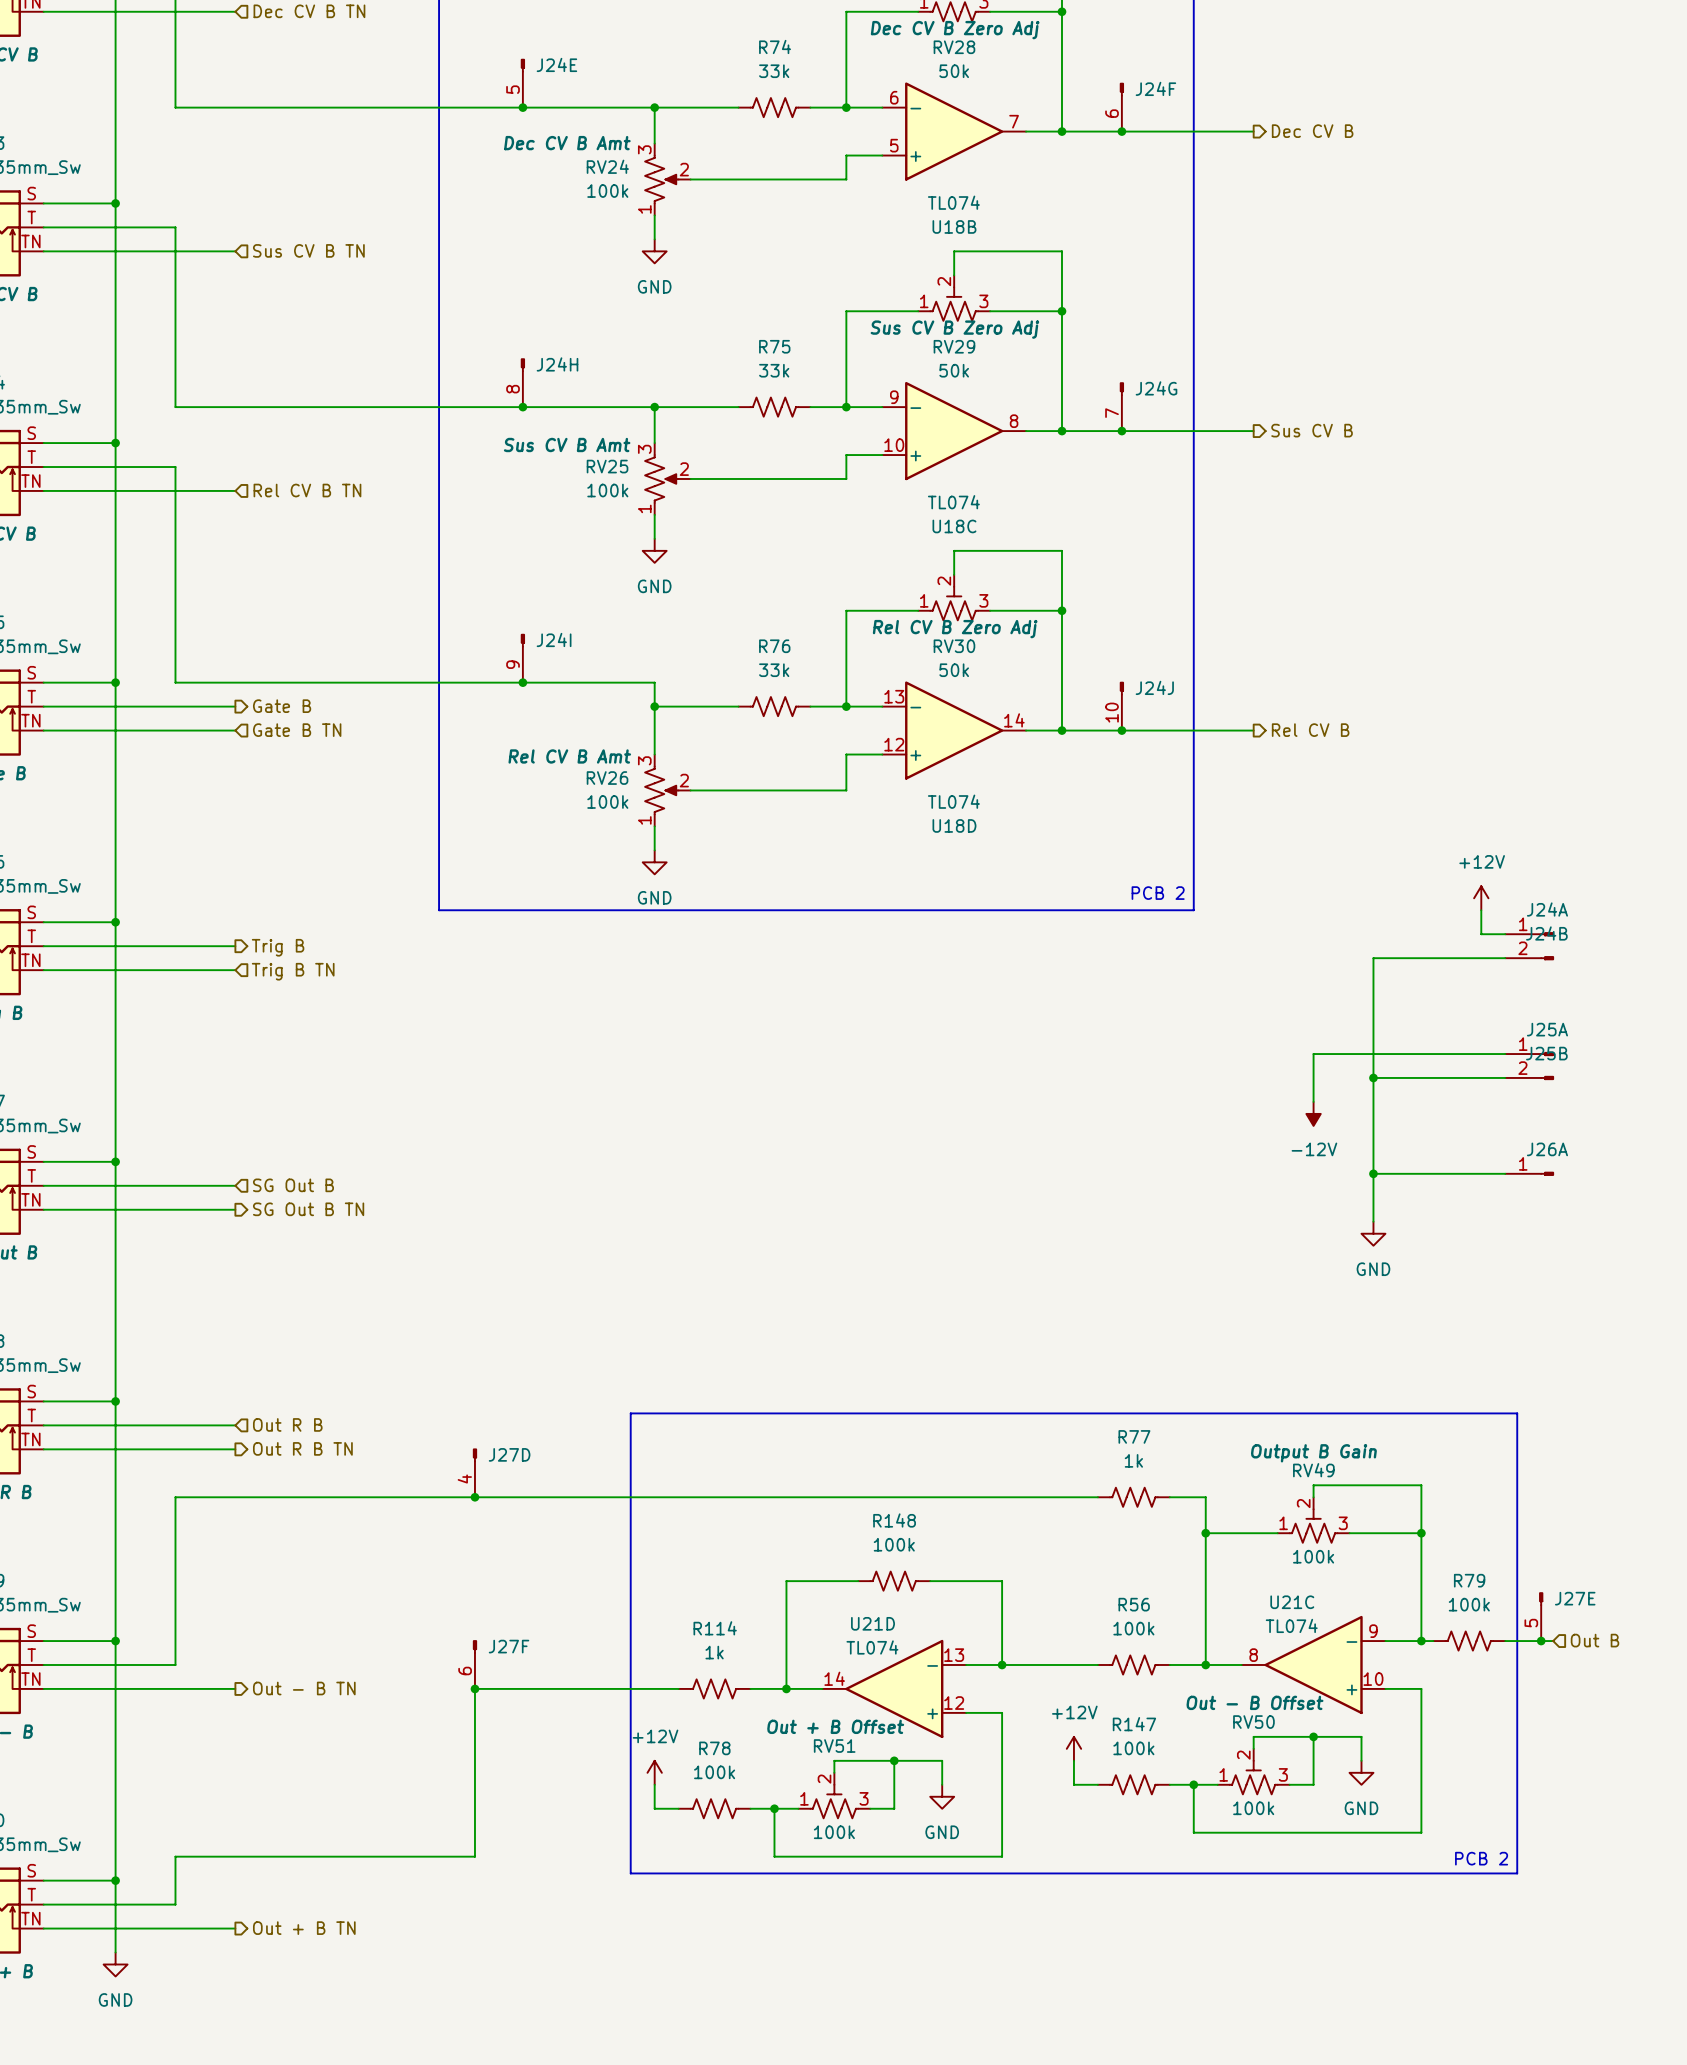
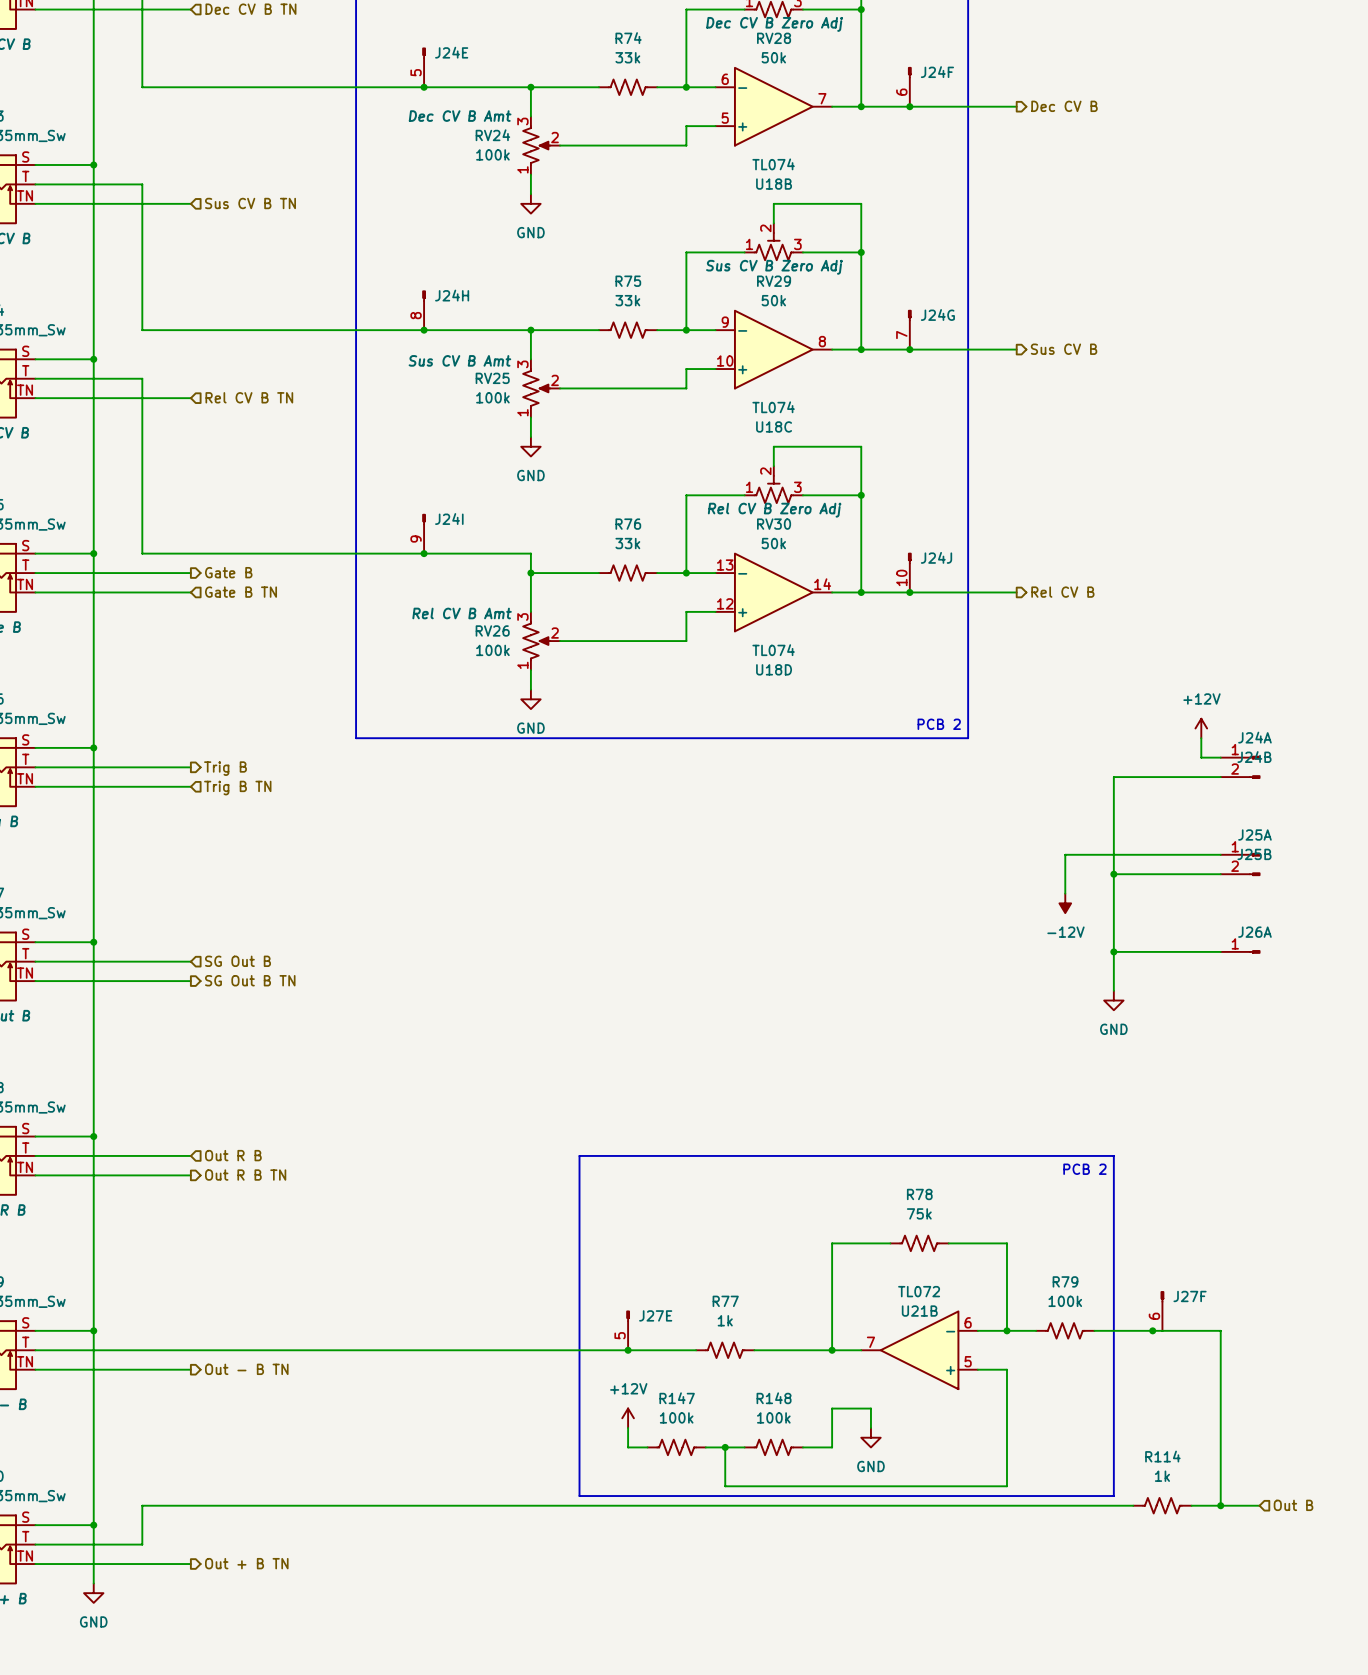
line: (630, 1413) (1517, 1413) (1517, 1873) (630, 1873) (630, 1413) -> (579, 1155) (579, 1496) (1113, 1496) (1113, 1155) (579, 1155)
text: none -> PCB 2 (1084, 1169)
J27D: (474, 1472) -> none
junction: (474, 1497) -> none
wire: (1097, 1497) (175, 1497) (175, 1664) -> (696, 1350) (142, 1350)
R77 position: (1133, 1497) -> (725, 1350)
wire: (1169, 1497) (1205, 1497) (1205, 1664) -> none
wire: (1313, 1497) (1313, 1485) (1421, 1485) (1421, 1641) -> none
RV49: 100k (1313, 1520) -> none
wire: none -> (890, 1243) (832, 1243) (832, 1350)
wire: none -> (948, 1243) (977, 1243)
junction: (1205, 1533) -> none
wire: (1241, 1533) (1277, 1533) -> (1006, 1243) (1006, 1330)
wire: (1349, 1533) (1421, 1533) -> none
junction: (1421, 1533) -> none
wire: (858, 1581) (786, 1581) (786, 1688) -> none
R148 position: (894, 1581) -> (773, 1447)
wire: (930, 1581) (1002, 1581) (1002, 1664) -> none
J27E position: (1541, 1616) -> (628, 1330)
hierarchical label position: Out B (1595, 1640) -> Out B (1293, 1505)
wire: none -> (1162, 1330) (1220, 1330) (1220, 1505)
R79 position: (1469, 1641) -> (1065, 1330)
wire: (1505, 1641) (1553, 1641) -> none
junction: (1541, 1641) -> none
J27F position: (474, 1664) -> (1162, 1311)
junction position: (1002, 1664) -> (832, 1350)
R56: 100k (1133, 1664) -> none
U21B: none -> TL072 (919, 1350)
wire: (1169, 1664) (1241, 1664) -> (977, 1330) (1036, 1330)
junction position: (1205, 1664) -> (1006, 1330)
U21C: TL074 (1313, 1664) -> none
junction: (474, 1688) -> none
wire: (678, 1688) (474, 1688) (474, 1856) -> (628, 1505) (385, 1505)
R114 position: (714, 1688) -> (1162, 1505)
wire: (750, 1688) (822, 1688) -> none
junction position: (786, 1688) -> (628, 1350)
U21D: TL074 (894, 1688) -> none
wire: (1385, 1688) (1421, 1688) (1421, 1832) (1241, 1832) -> (977, 1369) (1006, 1369) (1006, 1486)
wire: (966, 1712) (1002, 1712) (1002, 1856) -> (1133, 1505) (812, 1505)
wire: (1313, 1736) (1313, 1784) (1289, 1784) -> none
junction: (1313, 1736) -> none
power symbol: +12V (1073, 1748) -> none
wire: (1253, 1748) (1253, 1736) (1361, 1736) (1361, 1760) -> none
wire: (894, 1760) (894, 1784) -> none
junction position: (894, 1760) -> (725, 1447)
wire: (1073, 1760) (1073, 1784) (1097, 1784) -> (870, 1428) (870, 1408) (832, 1408) (832, 1447) (802, 1447)
RV50: 100k (1253, 1771) -> none
power symbol position: +12V (654, 1772) -> +12V (628, 1418)
R78 value: 100k (714, 1772) -> 75k (919, 1213)
wire: (834, 1772) (834, 1760) (942, 1760) (942, 1784) -> none
power symbol: GND (1361, 1772) -> none
wire: (654, 1784) (654, 1808) (678, 1808) -> (628, 1428) (628, 1447) (647, 1447)
R147 position: (1133, 1784) -> (676, 1447)
wire: (1169, 1784) (1217, 1784) -> none
wire: (1193, 1784) (1193, 1832) -> (725, 1466) (725, 1486) (968, 1486)
junction: (1193, 1784) -> none
RV51: 100k (834, 1795) -> none
power symbol position: GND (942, 1796) -> GND (870, 1437)
R78 position: (714, 1808) -> (919, 1243)
wire: (750, 1808) (798, 1808) -> (705, 1447) (744, 1447)
wire: (774, 1808) (774, 1856) -> none
junction: (774, 1808) -> none
wire: (870, 1808) (894, 1808) -> none
wire: none -> (1191, 1505) (1259, 1505)
junction: none -> (1220, 1505)
text: PCB 2 (1481, 1858) -> none

